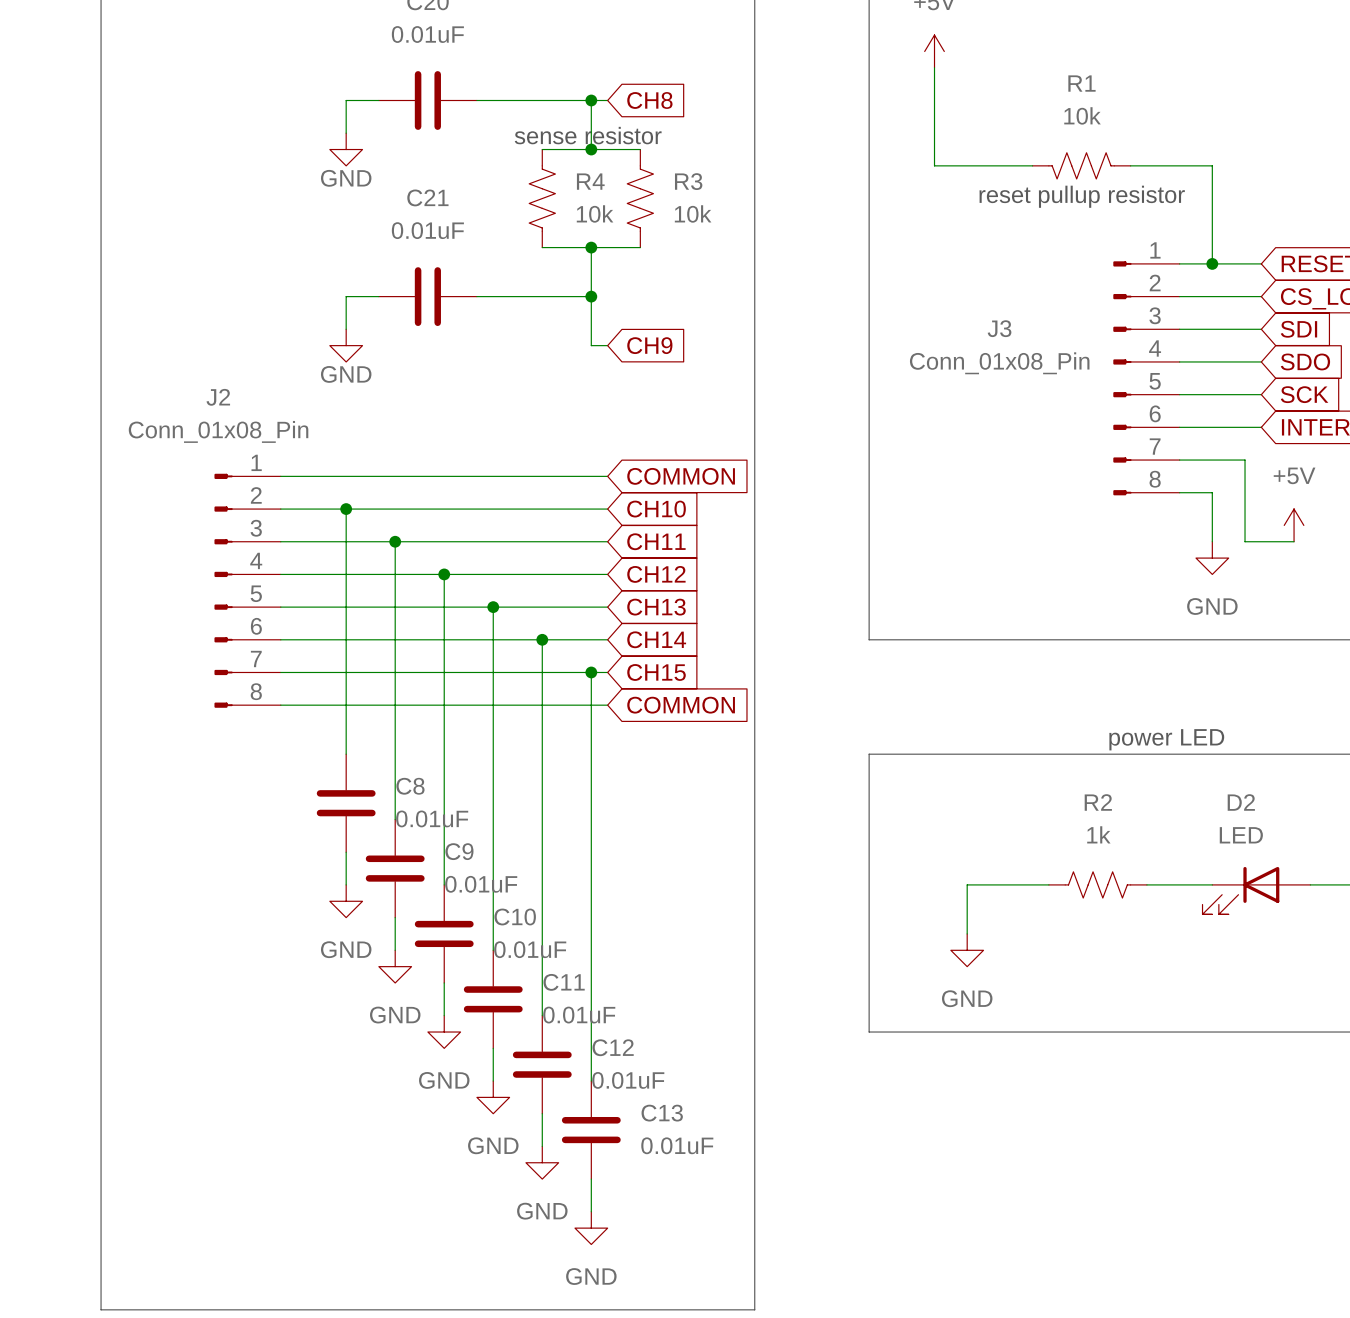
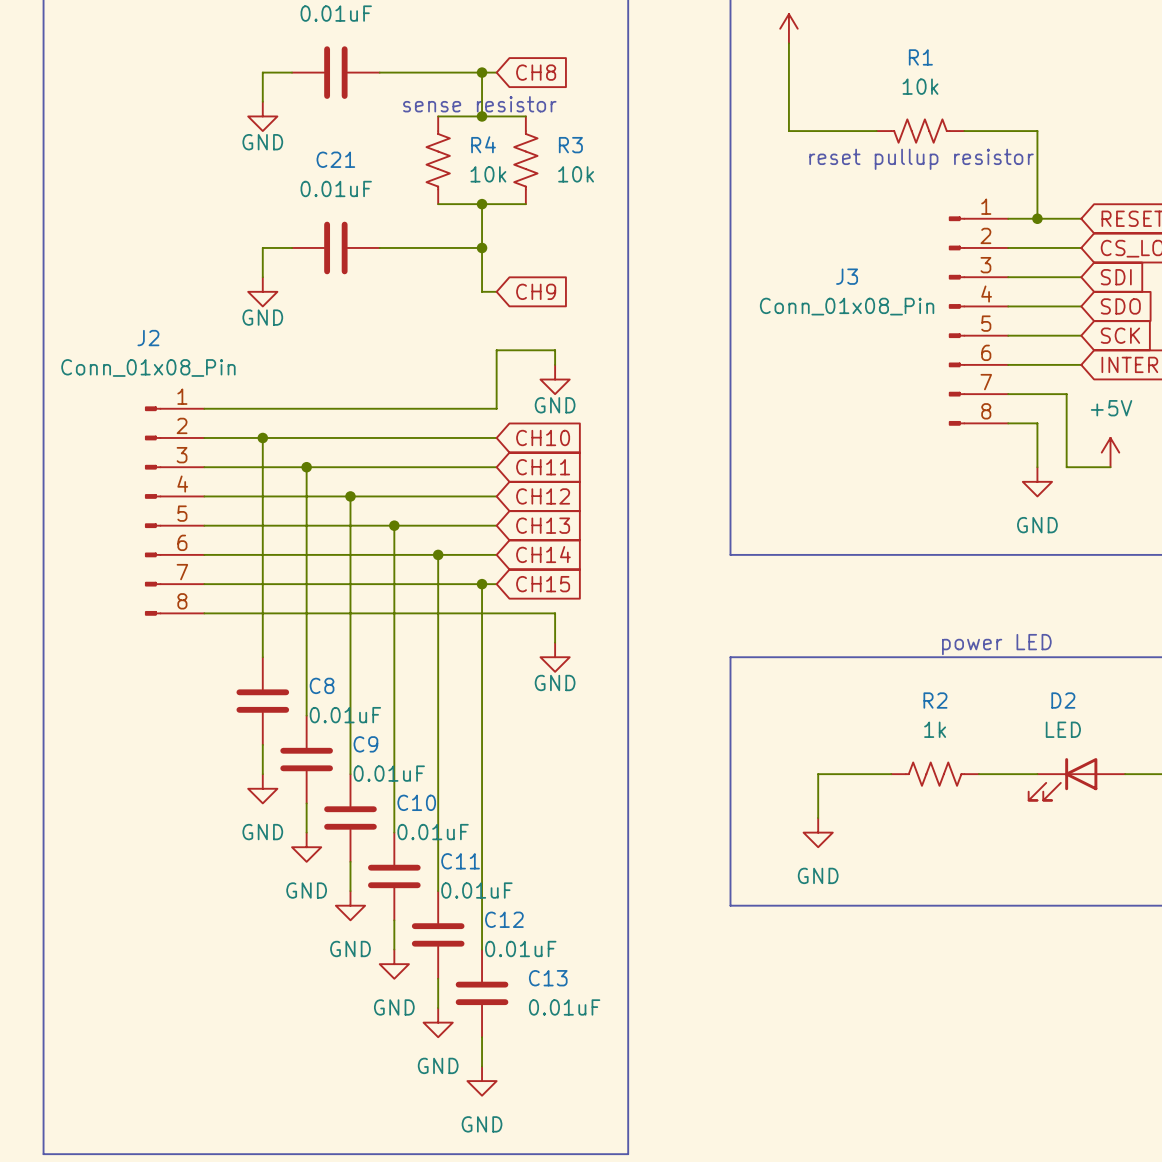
wire: none -> (555, 364) (555, 350) (496, 350) (496, 408)
power symbol: none -> GND (555, 379)
global label: COMMON (681, 476) -> none
wire: none -> (496, 613) (555, 613) (555, 642)
global label: COMMON (681, 705) -> none
power symbol: none -> GND (555, 657)

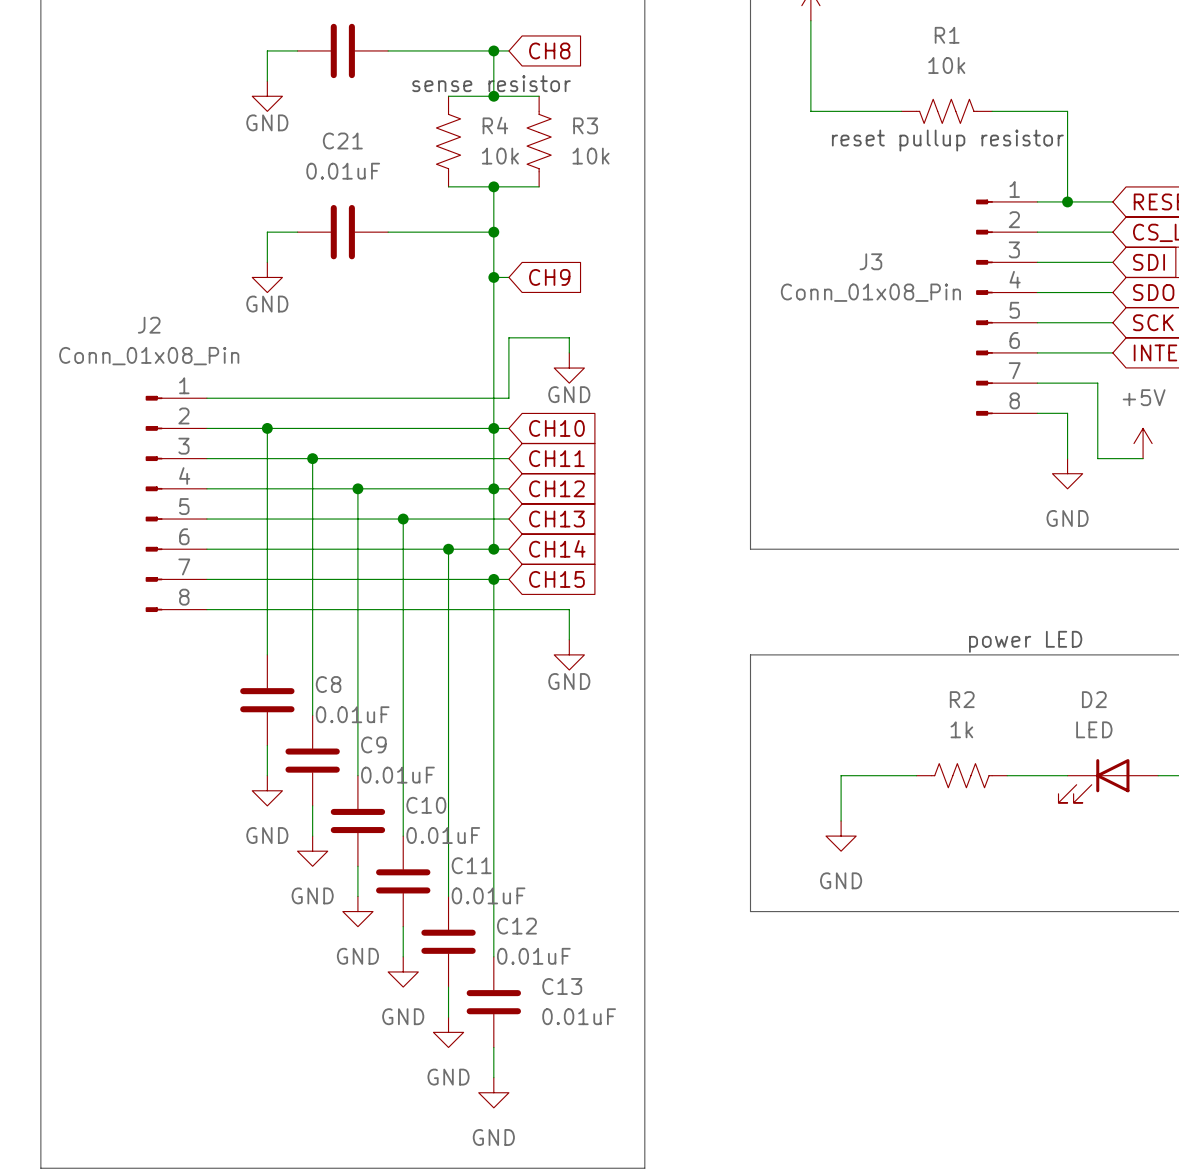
wire: none -> (493, 277) (493, 549)
junction: none -> (493, 277)
junction: none -> (493, 428)
junction: none -> (493, 488)
junction: none -> (493, 549)

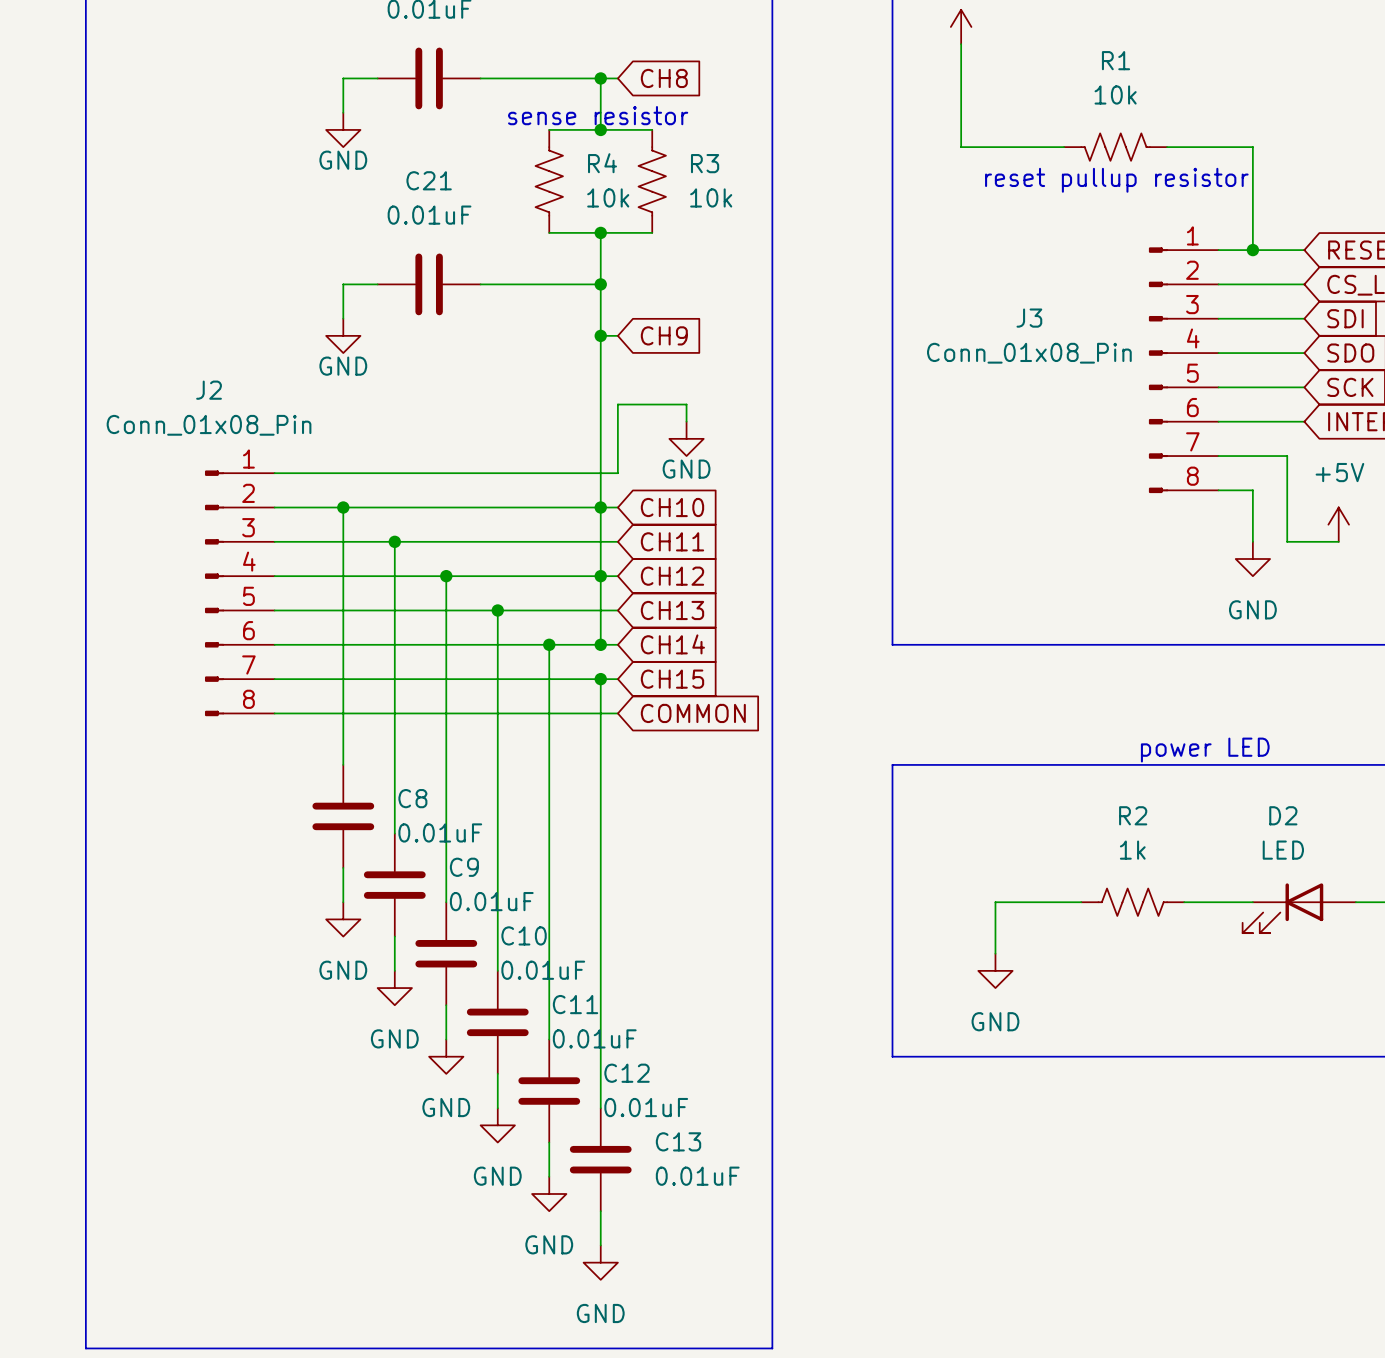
wire: (508, 609) (569, 609) (569, 639) -> none
global label: none -> COMMON (693, 713)
power symbol: GND (569, 654) -> none

